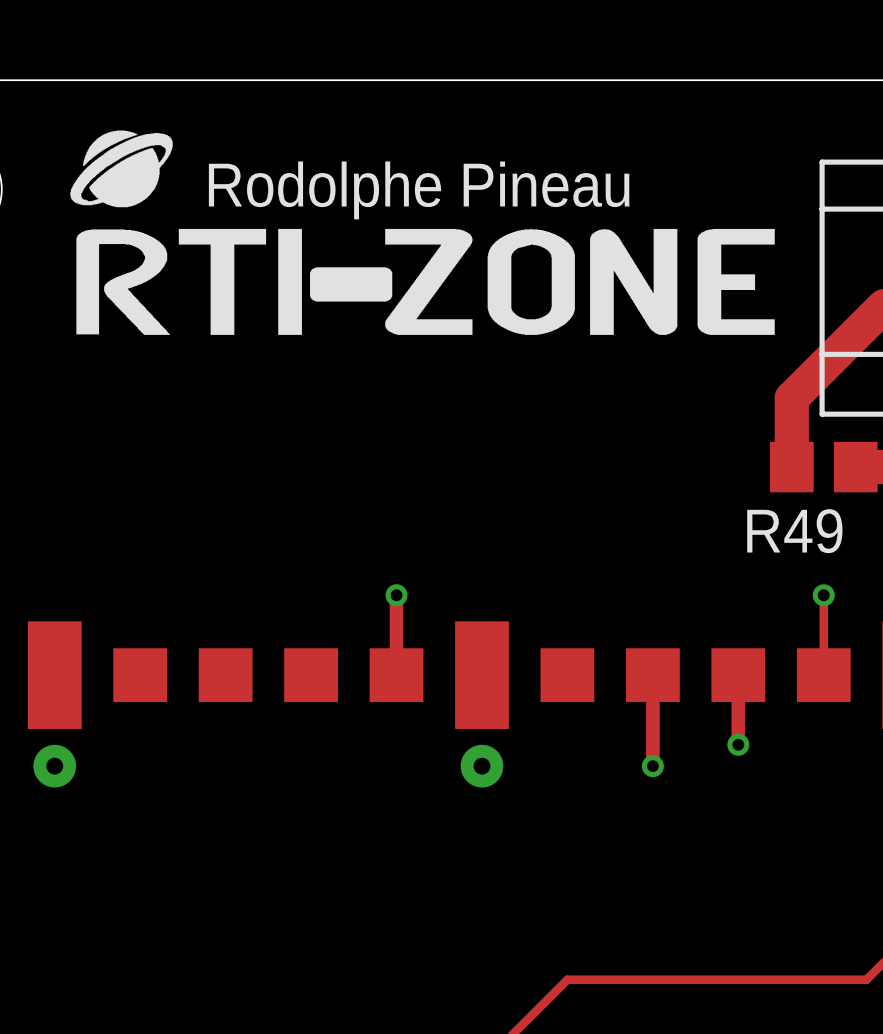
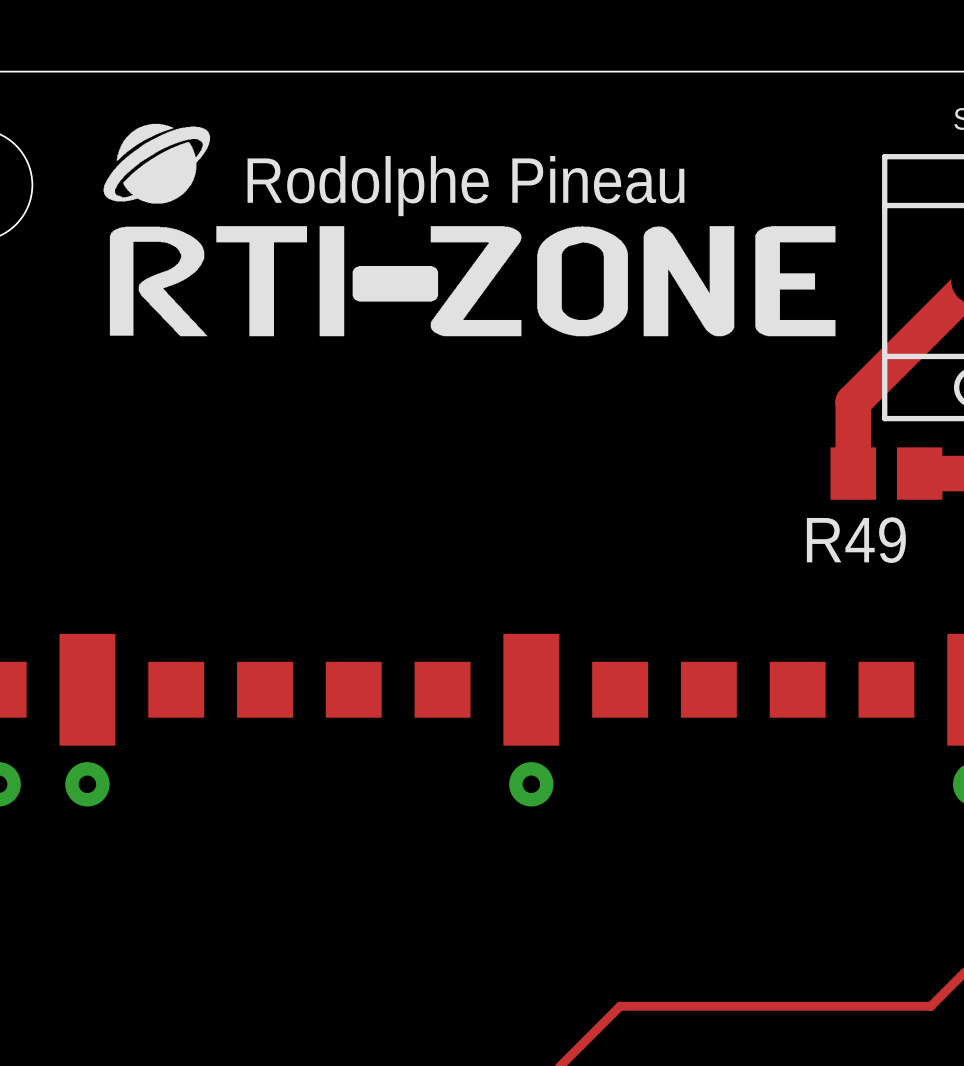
track: (396, 595) (396, 675) -> none
via: (396, 595) -> none
track: (823, 595) (823, 675) -> none
via: (823, 595) -> none
track: (652, 675) (652, 766) -> none
track: (738, 675) (738, 744) -> none
via: (738, 744) -> none
via: (652, 766) -> none

